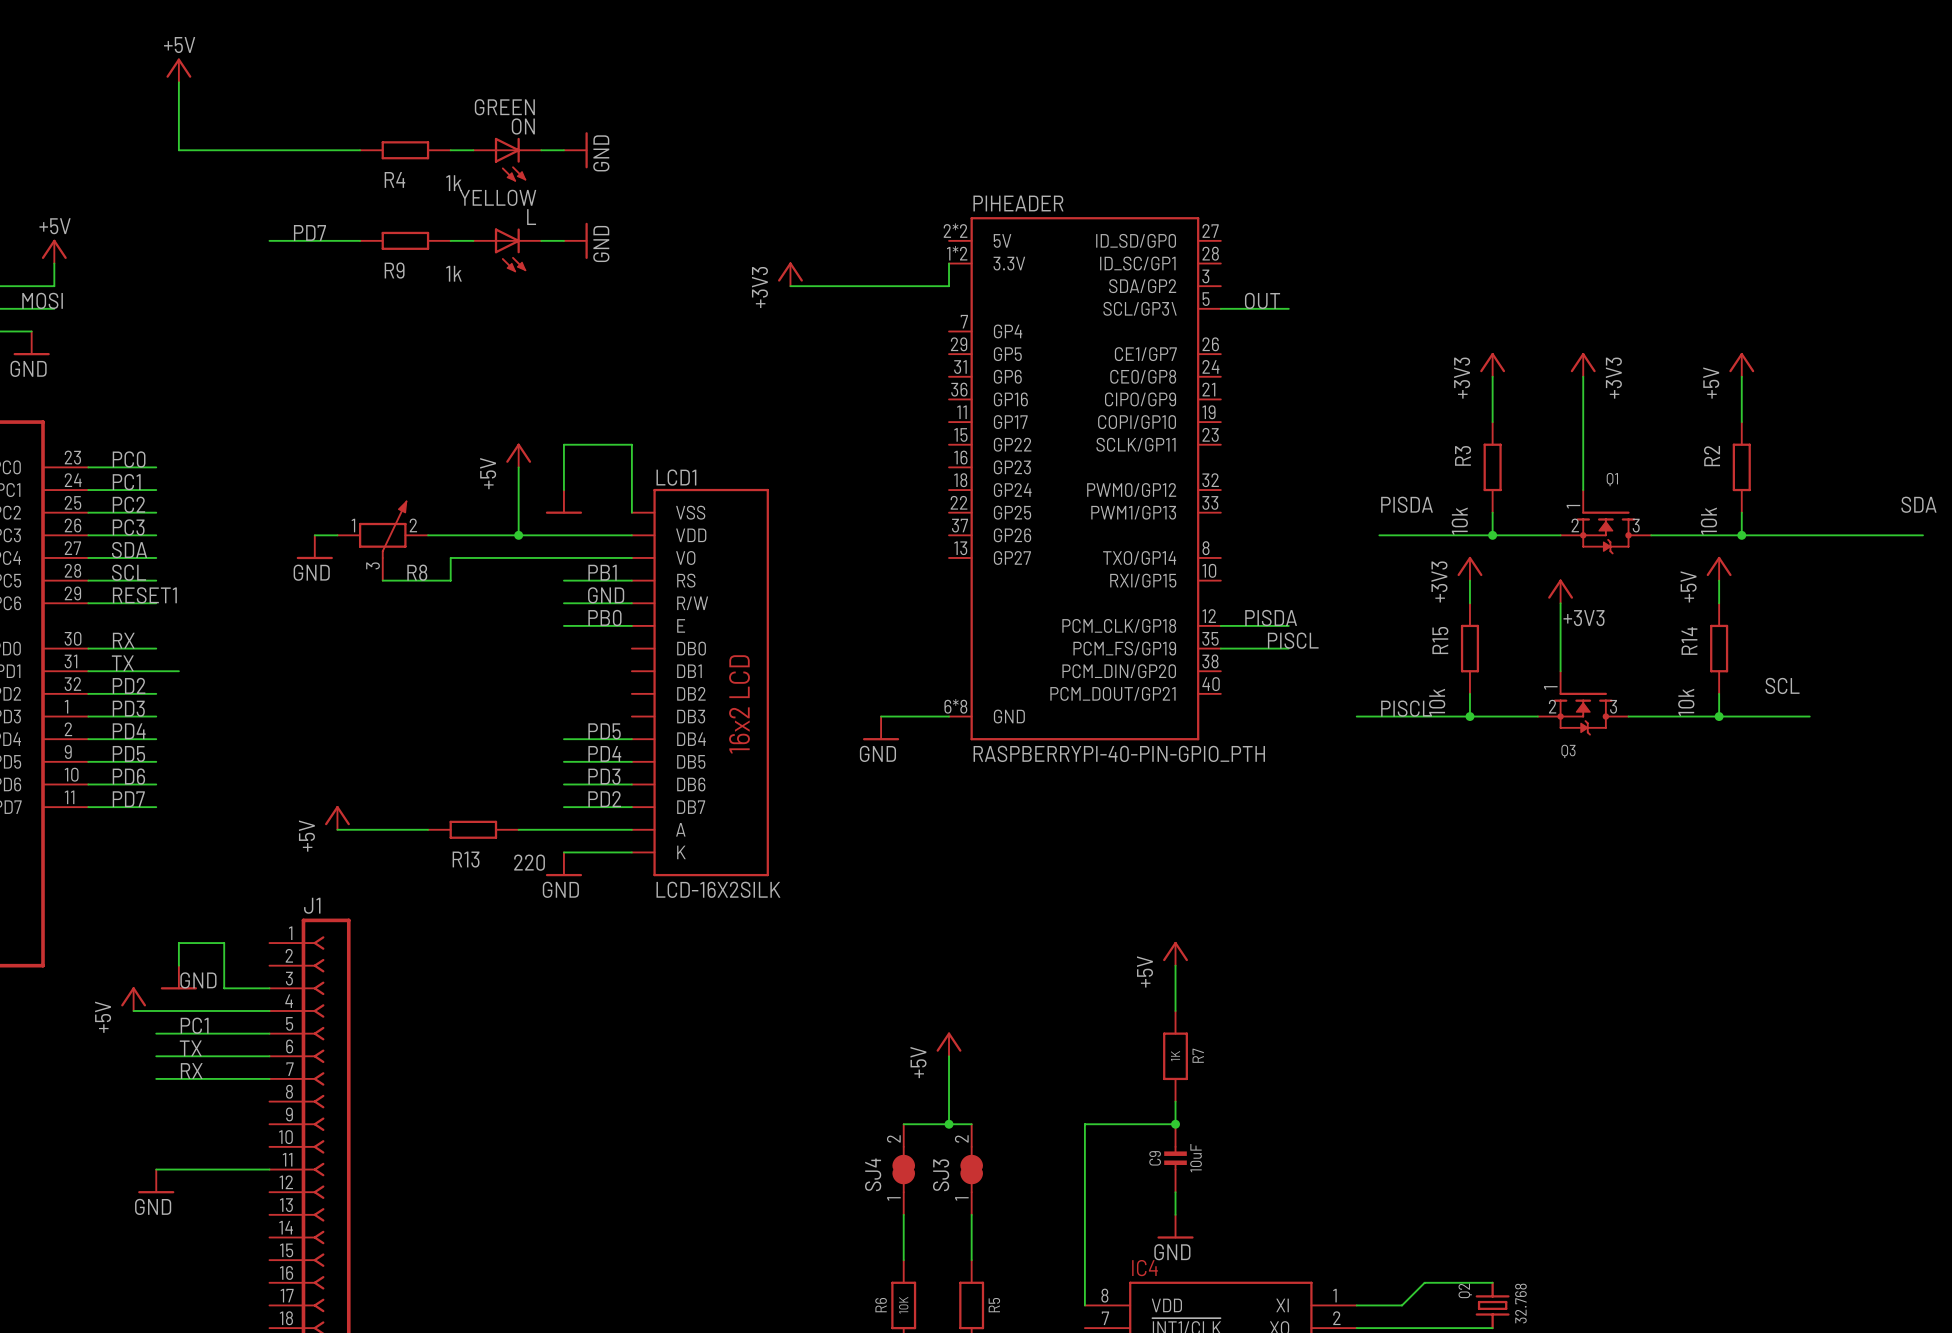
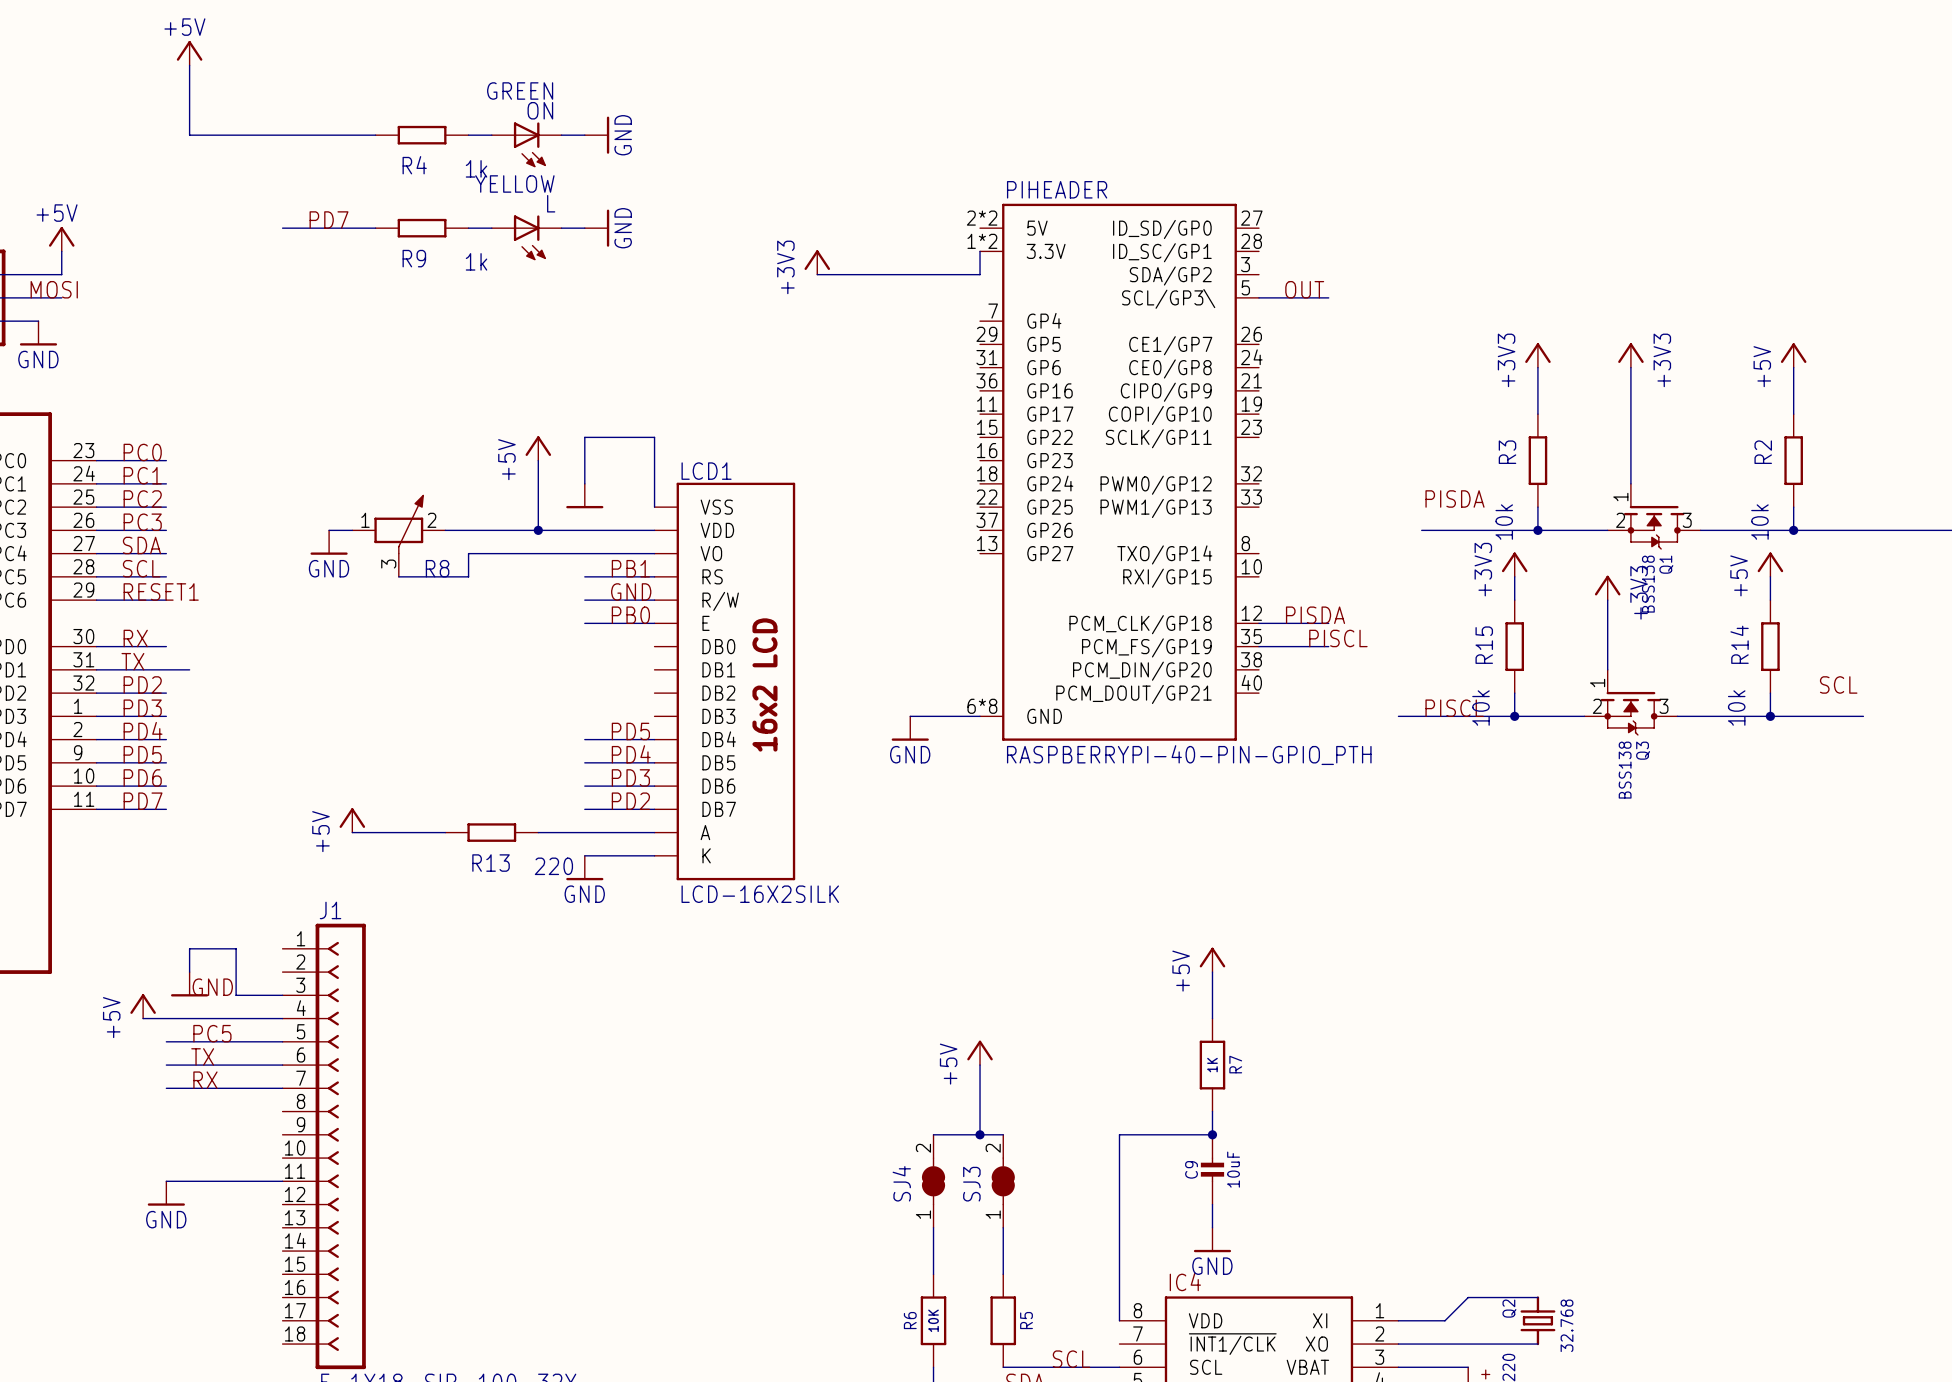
Q1 name rotation: 0° (1612, 479) -> 90° counterclockwise (1666, 564)
Q1 name position: Q1 (1612, 479) -> Q1 (1666, 564)
Q1 value: none -> BSS138 (1648, 584)
power symbol text rotation: 0° (1584, 618) -> 90° counterclockwise (1639, 592)
Q3 name rotation: 0° (1568, 751) -> 90° counterclockwise (1643, 750)
Q3 value: none -> BSS138 (1625, 770)
label: PC1 (194, 1025) -> PC5 (212, 1033)

